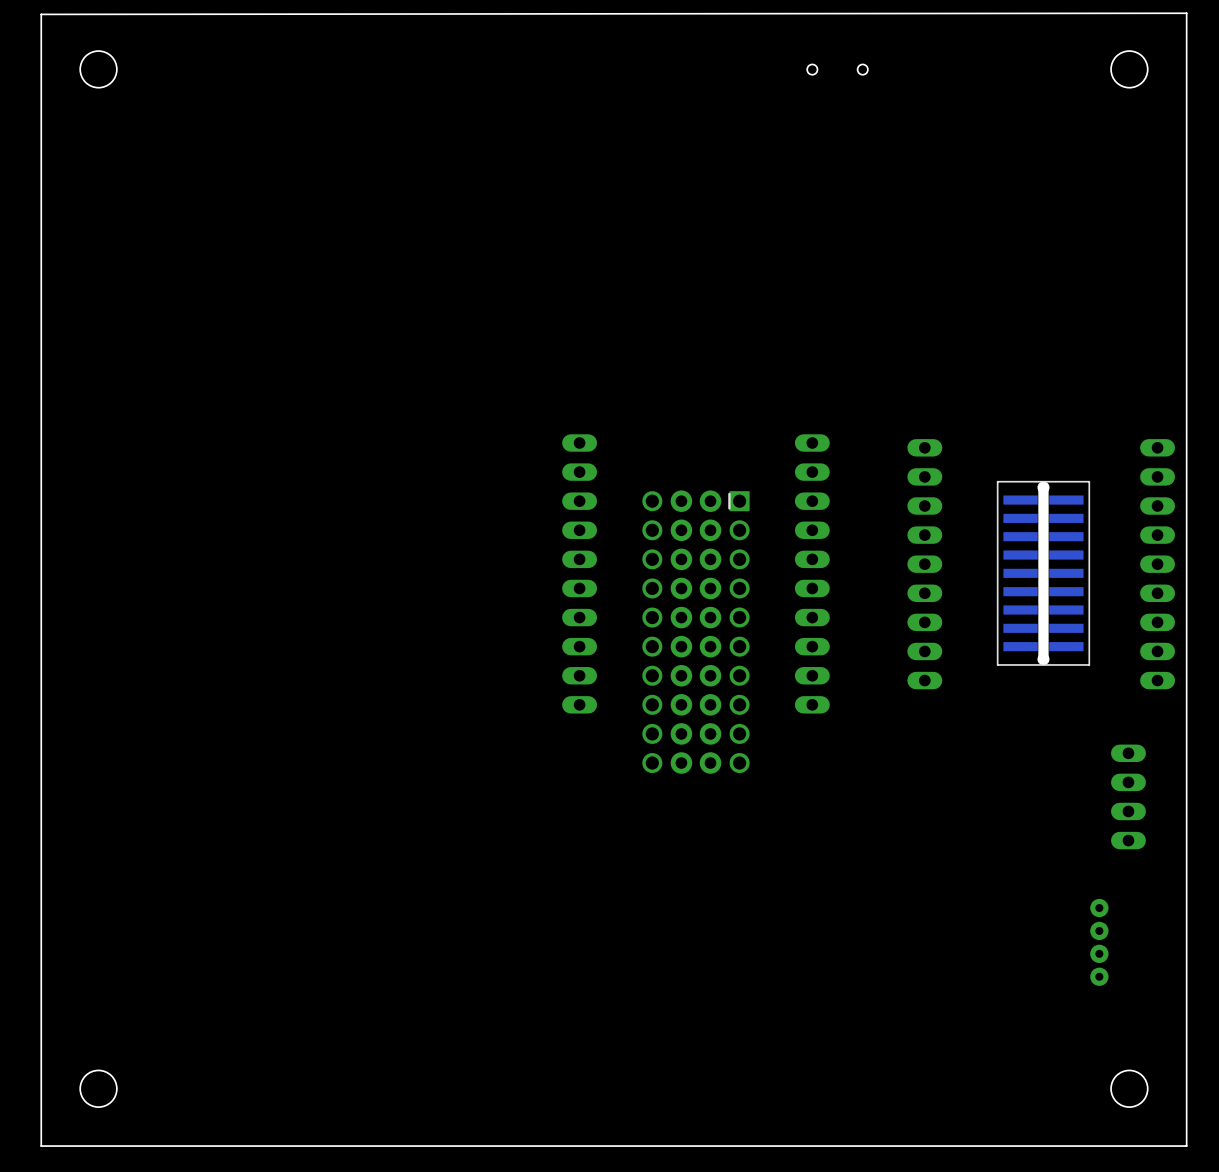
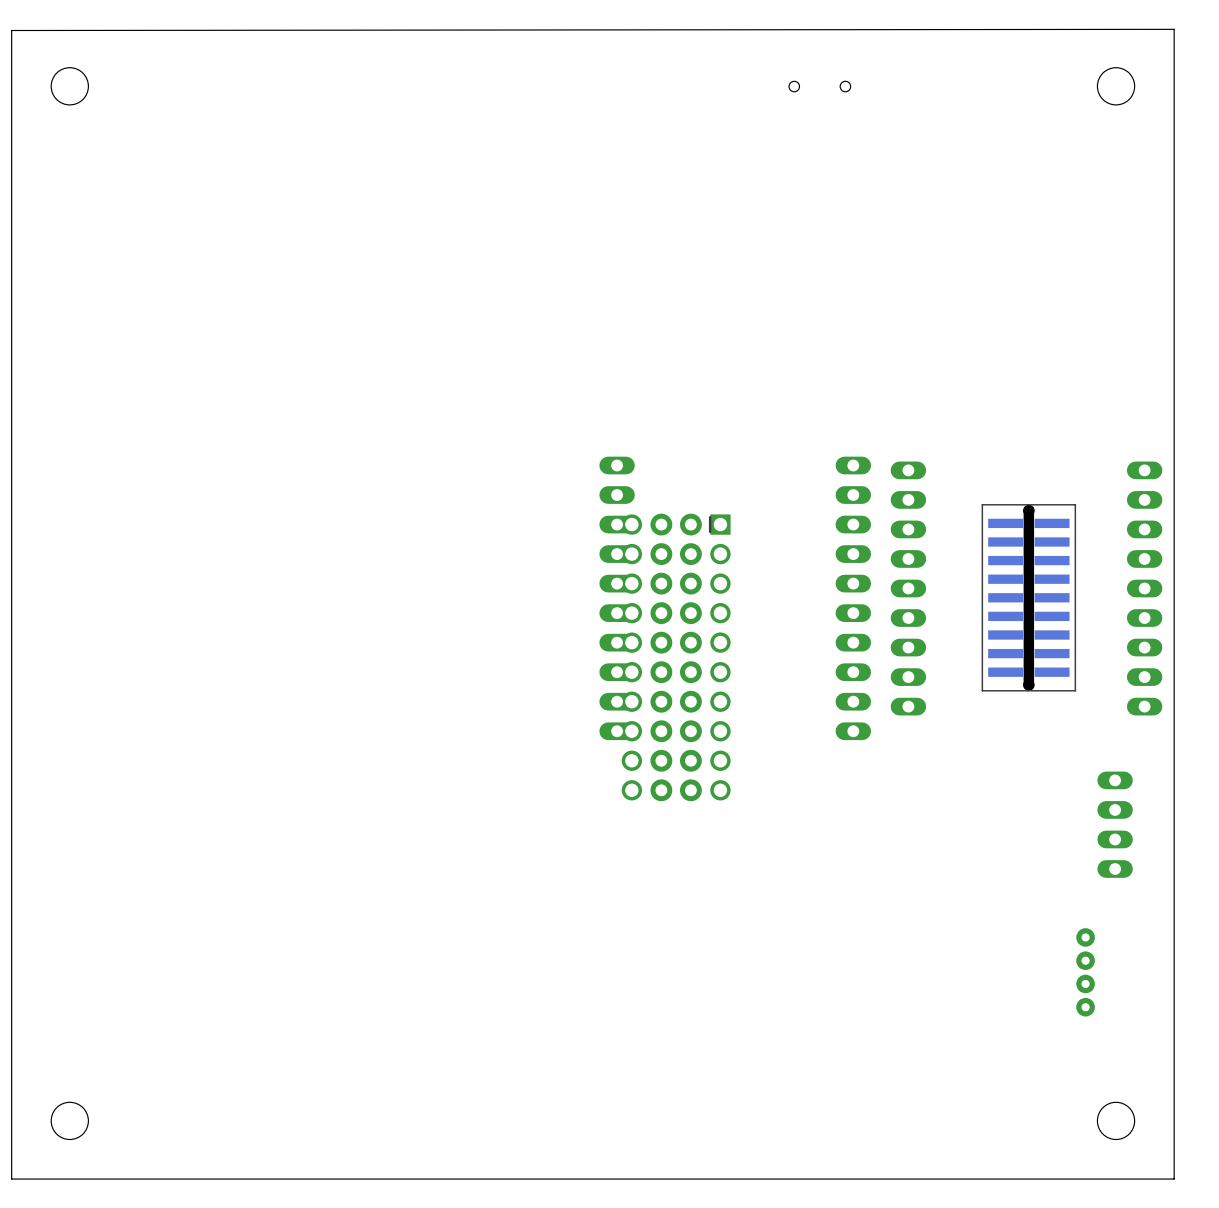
part position: (579, 573) -> (617, 598)
part position: (812, 573) -> (853, 598)

